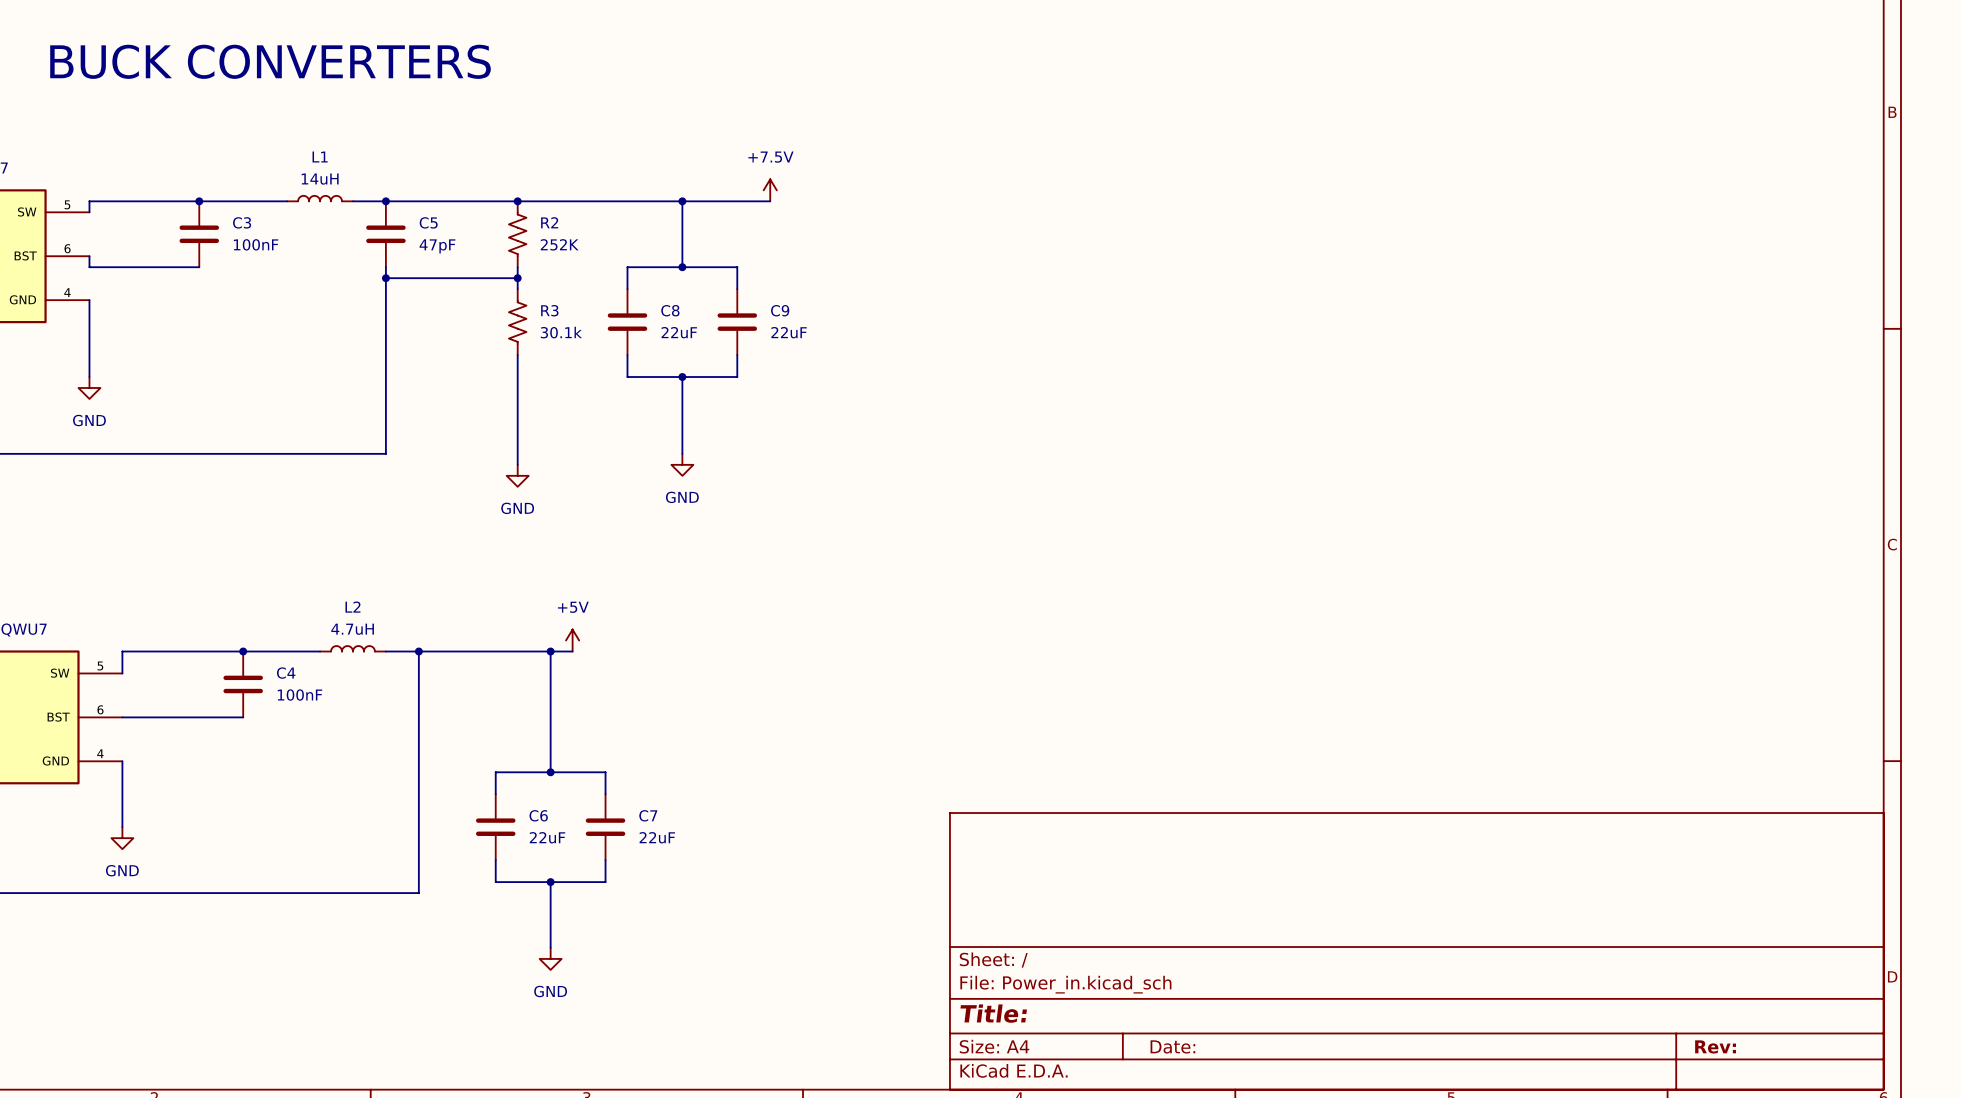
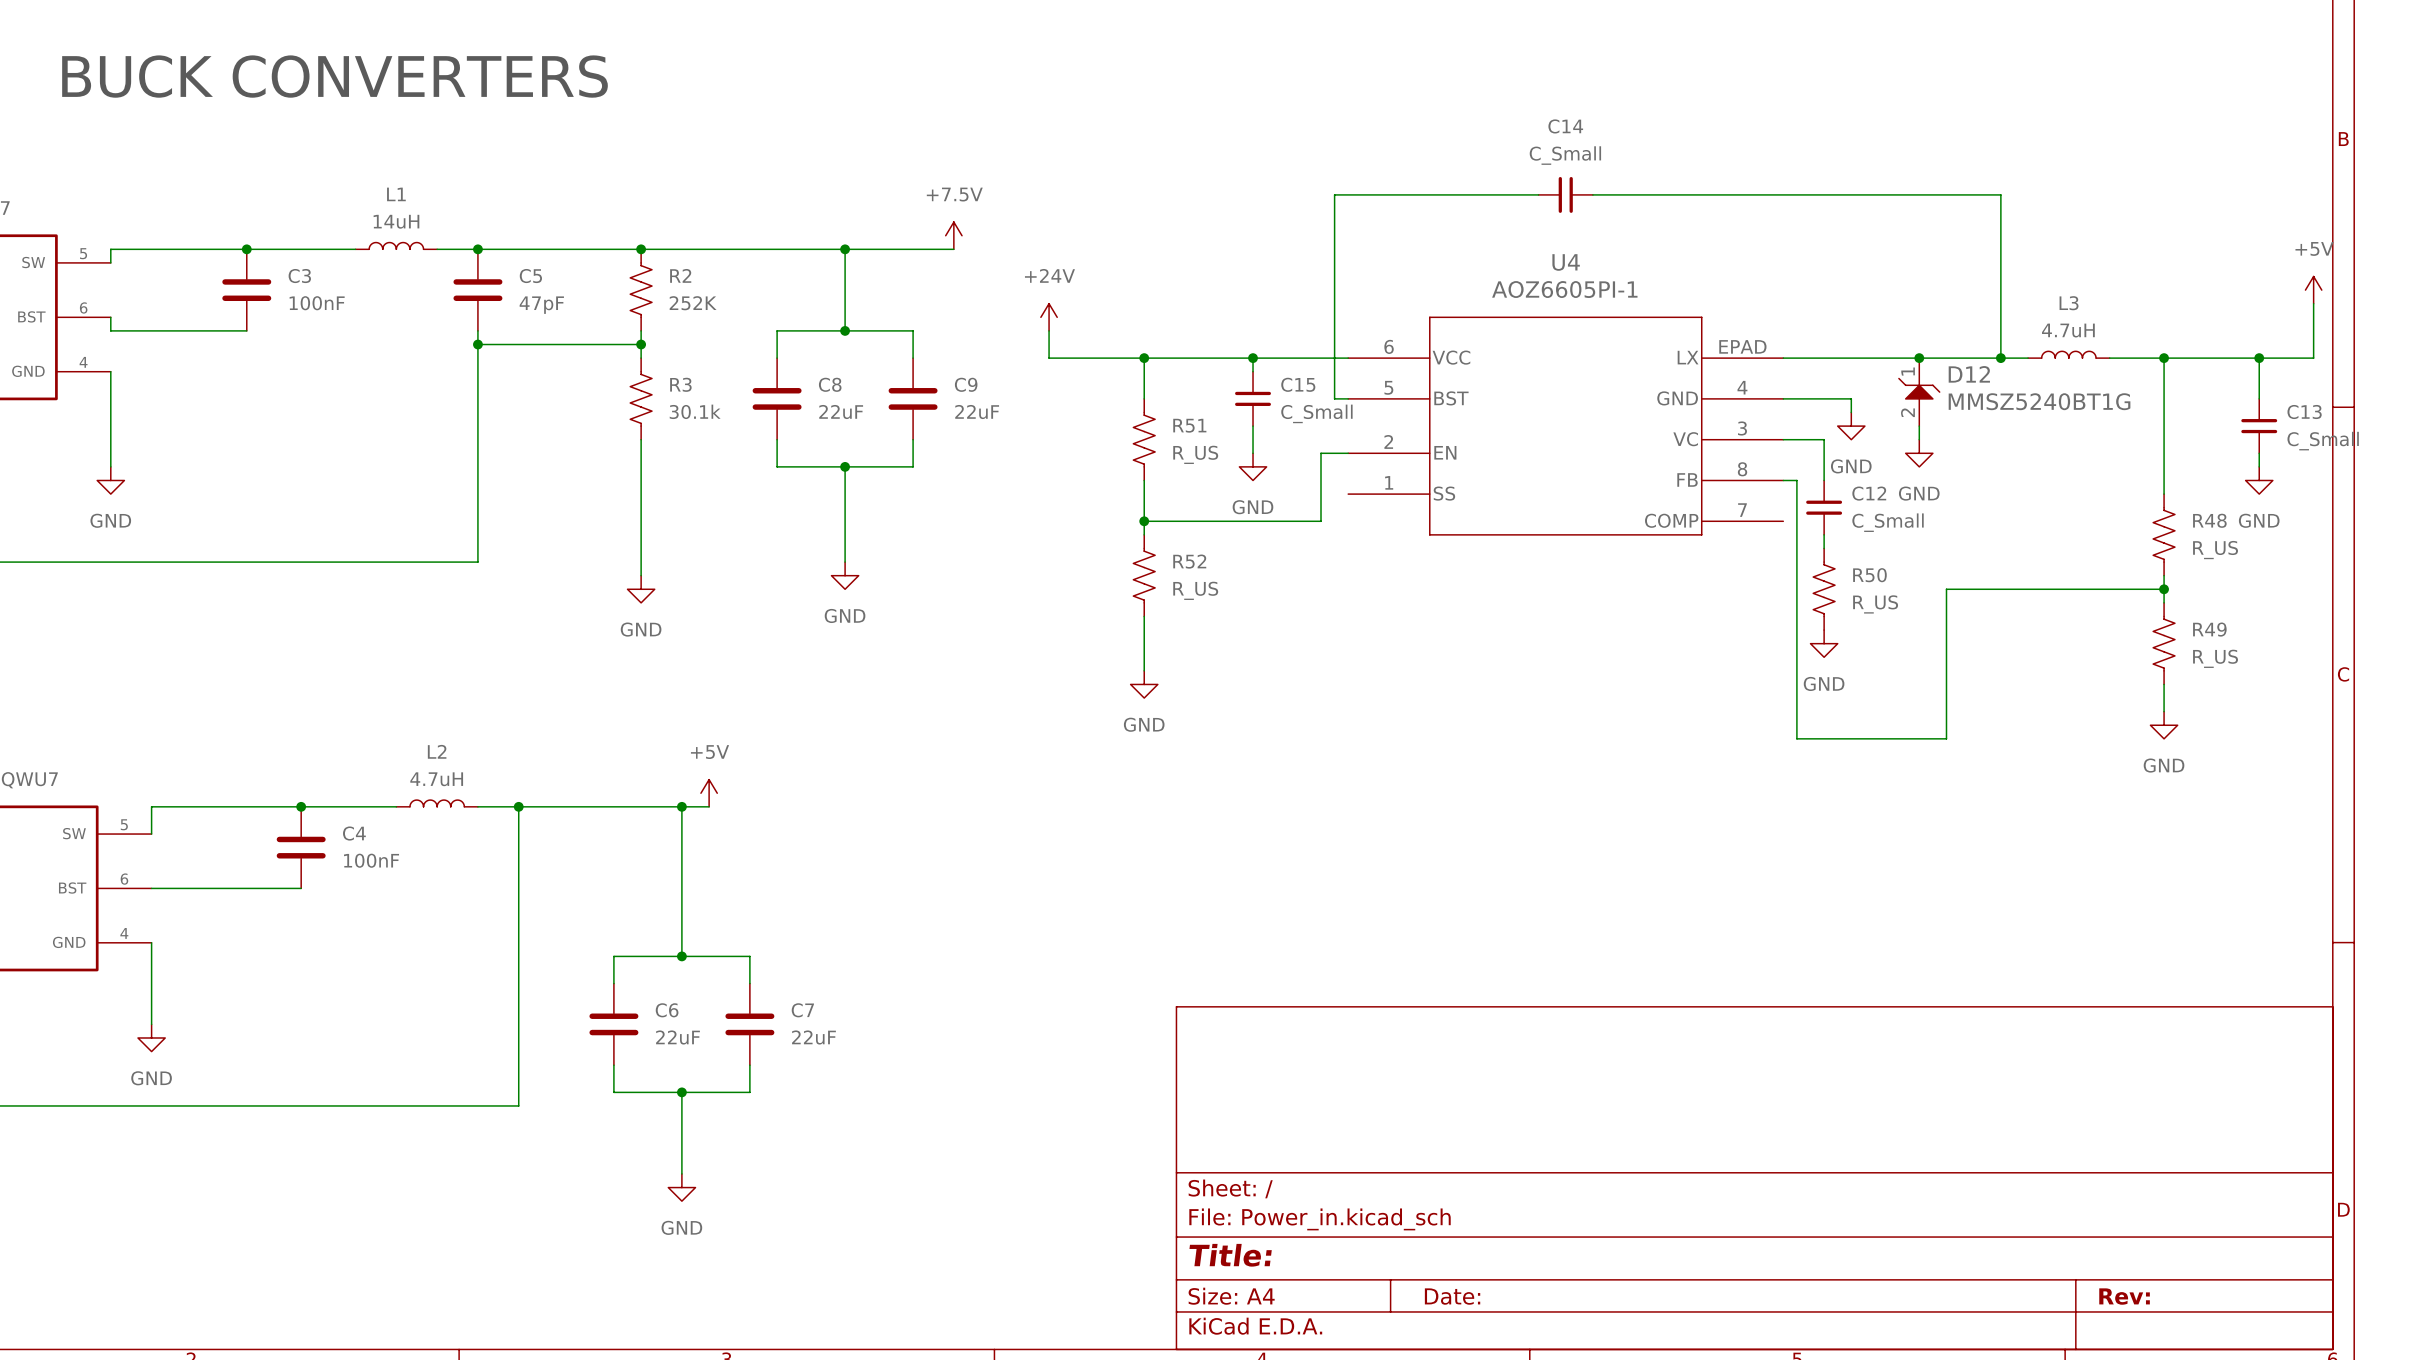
wire: none -> (1538, 194) (1334, 194) (1334, 398) (1348, 398)
C14: none -> C_Small (1565, 194)
wire: none -> (1592, 194) (2000, 194) (2000, 358)
power symbol: none -> +5V (2313, 290)
wire: none -> (2313, 303) (2313, 358) (2109, 358)
power symbol: none -> +24V (1049, 317)
wire: none -> (1049, 330) (1049, 358) (1348, 358)
L3: none -> 4.7uH (2068, 354)
wire: none -> (1144, 358) (1144, 398)
junction: none -> (1144, 358)
wire: none -> (1253, 358) (1253, 371)
junction: none -> (1253, 358)
wire: none -> (1783, 358) (2028, 358)
junction: none -> (1919, 358)
junction: none -> (2000, 358)
wire: none -> (2164, 358) (2164, 494)
junction: none -> (2164, 358)
wire: none -> (2259, 358) (2259, 398)
junction: none -> (2259, 358)
D12: none -> MMSZ5240BT1G (1919, 392)
C15: none -> C_Small (1253, 398)
wire: none -> (1783, 398) (1851, 398) (1851, 412)
wire: none -> (1253, 426) (1253, 453)
U4: none -> AOZ6605PI-1 (1565, 426)
power symbol: none -> GND (1851, 426)
wire: none -> (1919, 426) (1919, 439)
C13: none -> C_Small (2259, 426)
R51: none -> R_US (1144, 439)
wire: none -> (1783, 439) (1824, 439) (1824, 480)
wire: none -> (1348, 453) (1321, 453) (1321, 521) (1144, 521)
power symbol: none -> GND (1919, 453)
wire: none -> (2259, 453) (2259, 466)
power symbol: none -> GND (1253, 466)
wire: none -> (1144, 480) (1144, 534)
wire: none -> (1783, 480) (1796, 480) (1796, 738) (1946, 738) (1946, 589) (2164, 589)
power symbol: none -> GND (2259, 480)
C12: none -> C_Small (1824, 507)
junction: none -> (1144, 521)
wire: none -> (1824, 534) (1824, 548)
R48: none -> R_US (2164, 534)
R52: none -> R_US (1144, 575)
wire: none -> (2164, 575) (2164, 602)
R50: none -> R_US (1824, 589)
junction: none -> (2164, 589)
wire: none -> (1144, 616) (1144, 670)
power symbol: none -> GND (1824, 643)
R49: none -> R_US (2164, 643)
power symbol: none -> GND (1144, 684)
wire: none -> (2164, 684) (2164, 711)
power symbol: none -> GND (2164, 725)

